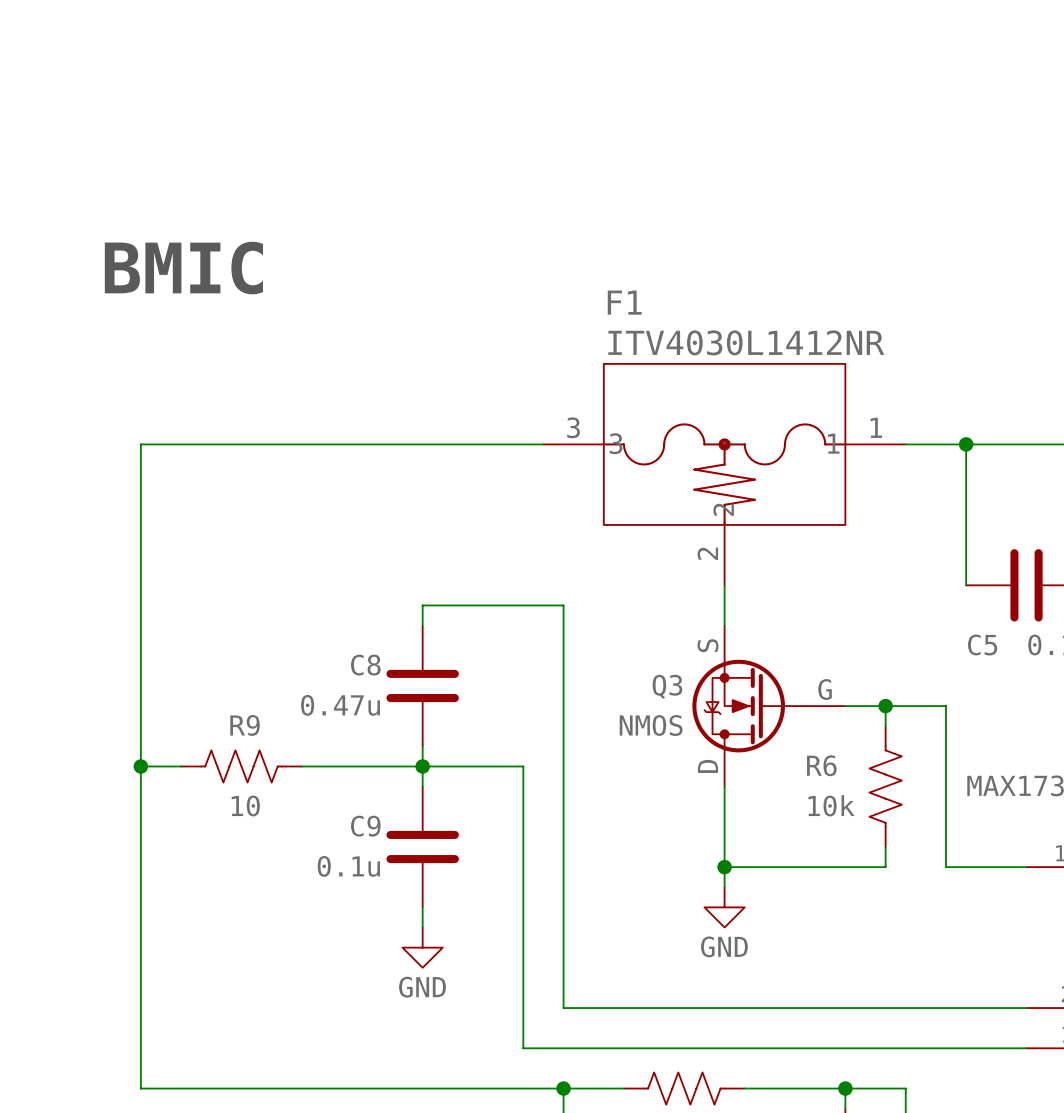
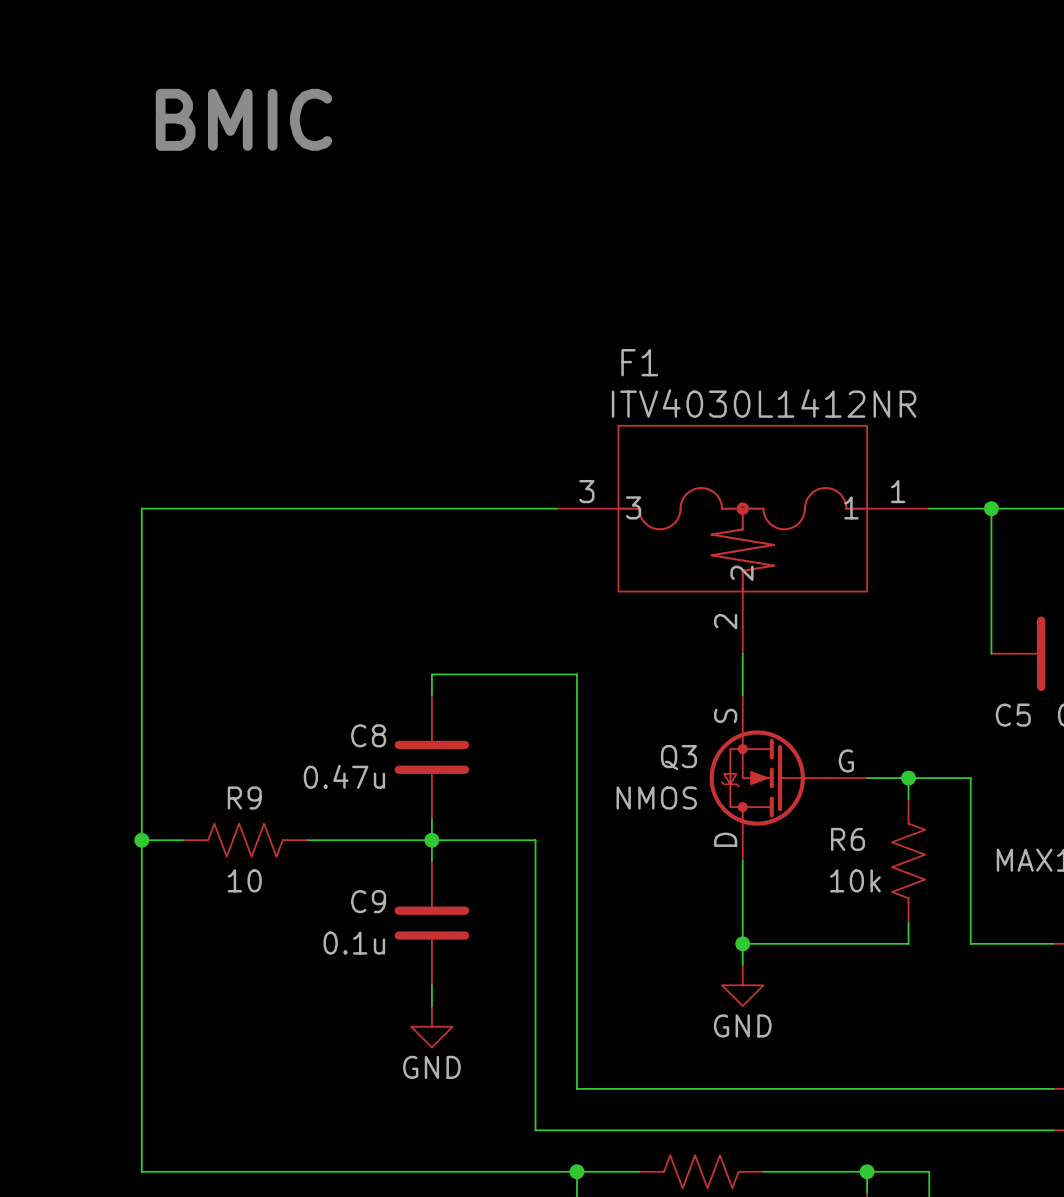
text position: BMIC (183, 268) -> BMIC (243, 119)

